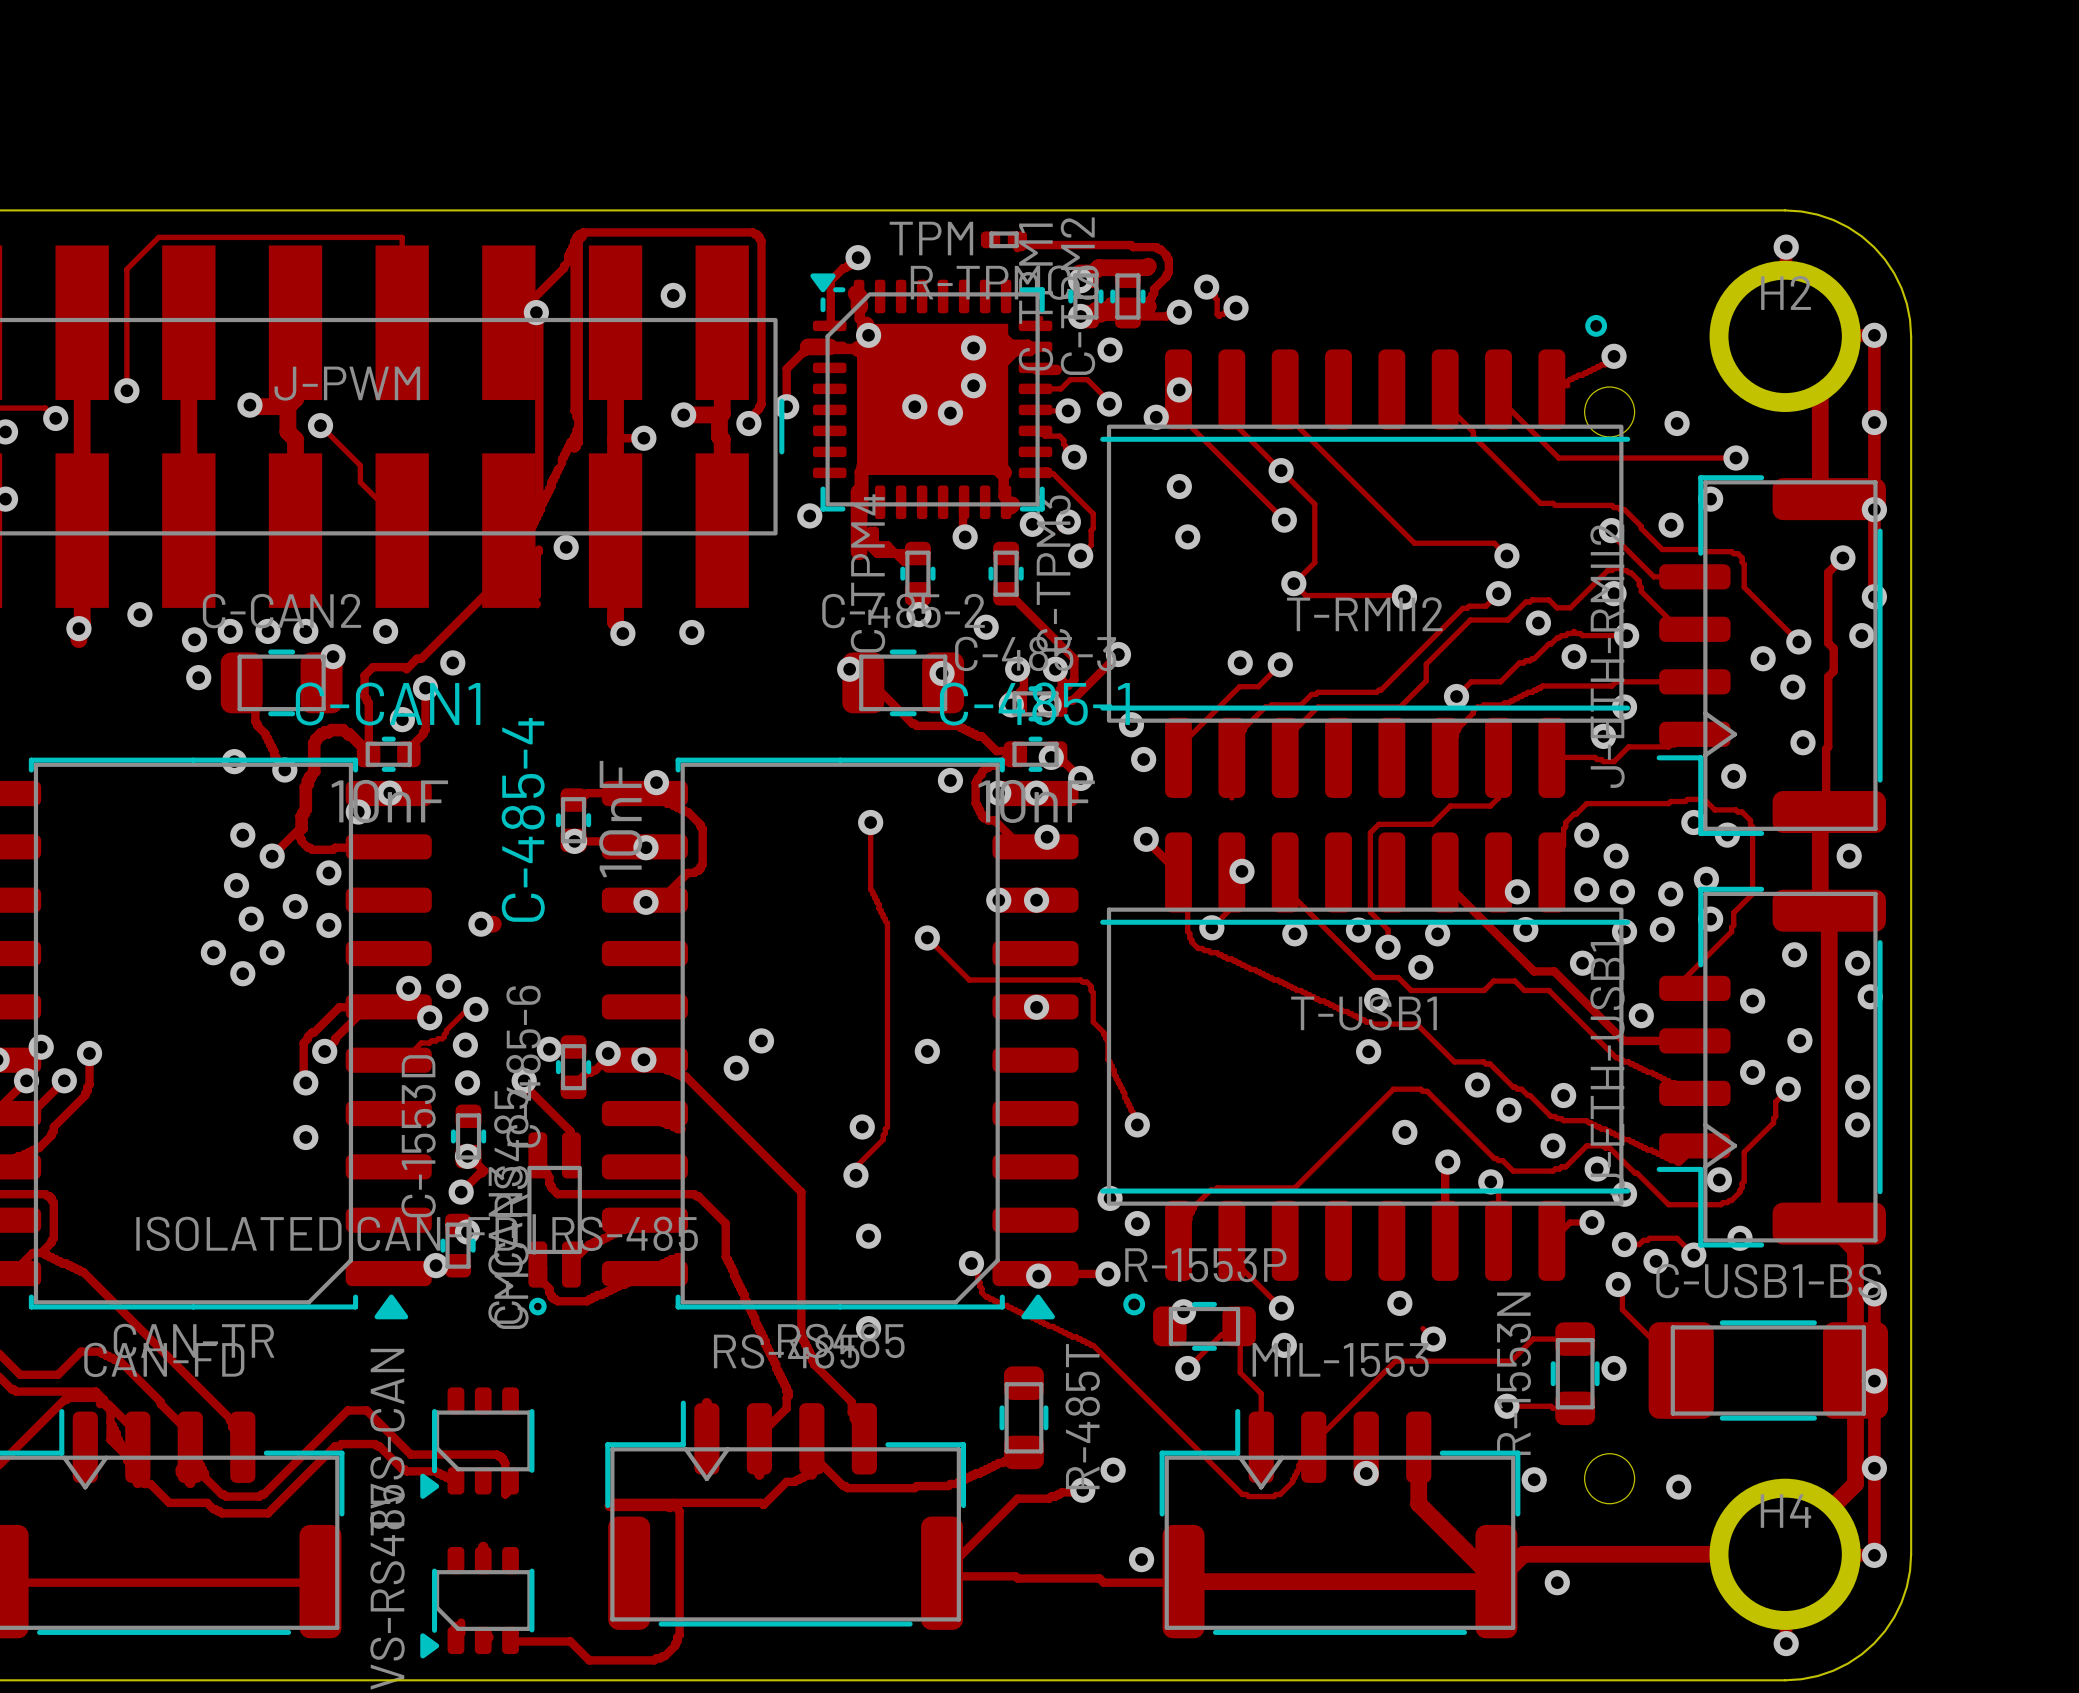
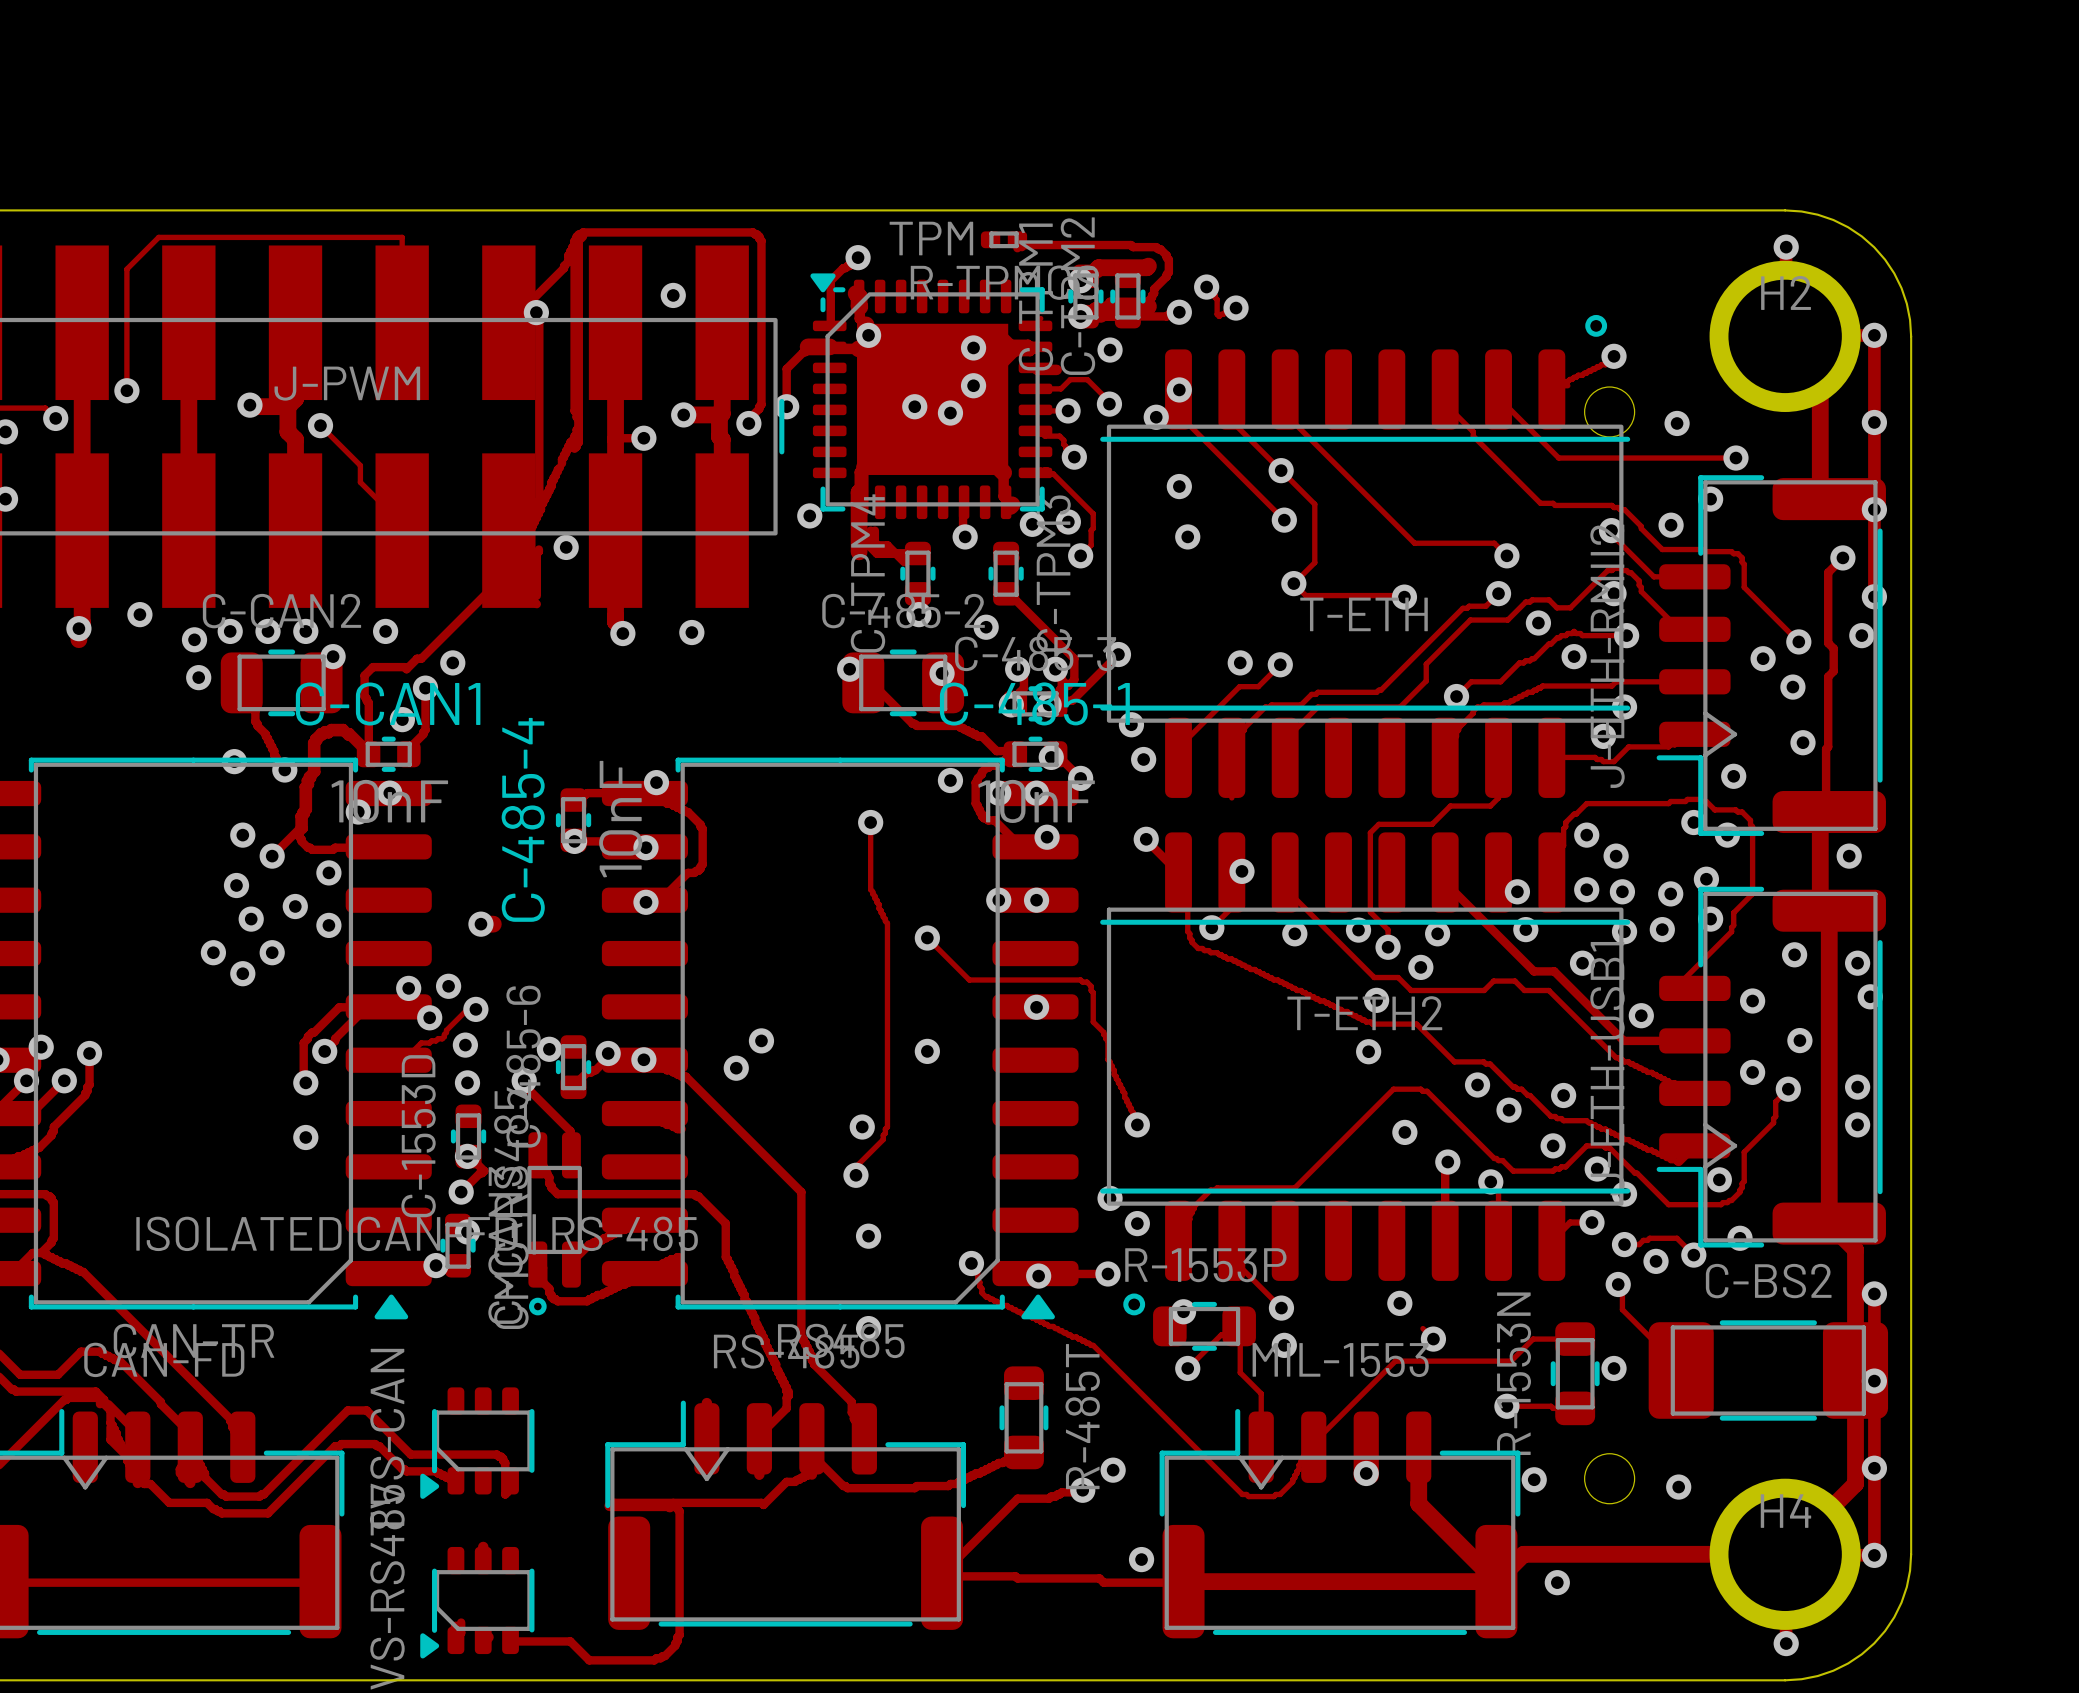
T-RMII2 name: T-RMII2 (1364, 614) -> T-ETH (1364, 614)
T-USB1 name: T-USB1 (1363, 1013) -> T-ETH2 (1364, 1013)
C-USB1-BS name: C-USB1-BS (1768, 1281) -> C-BS2 (1768, 1281)

